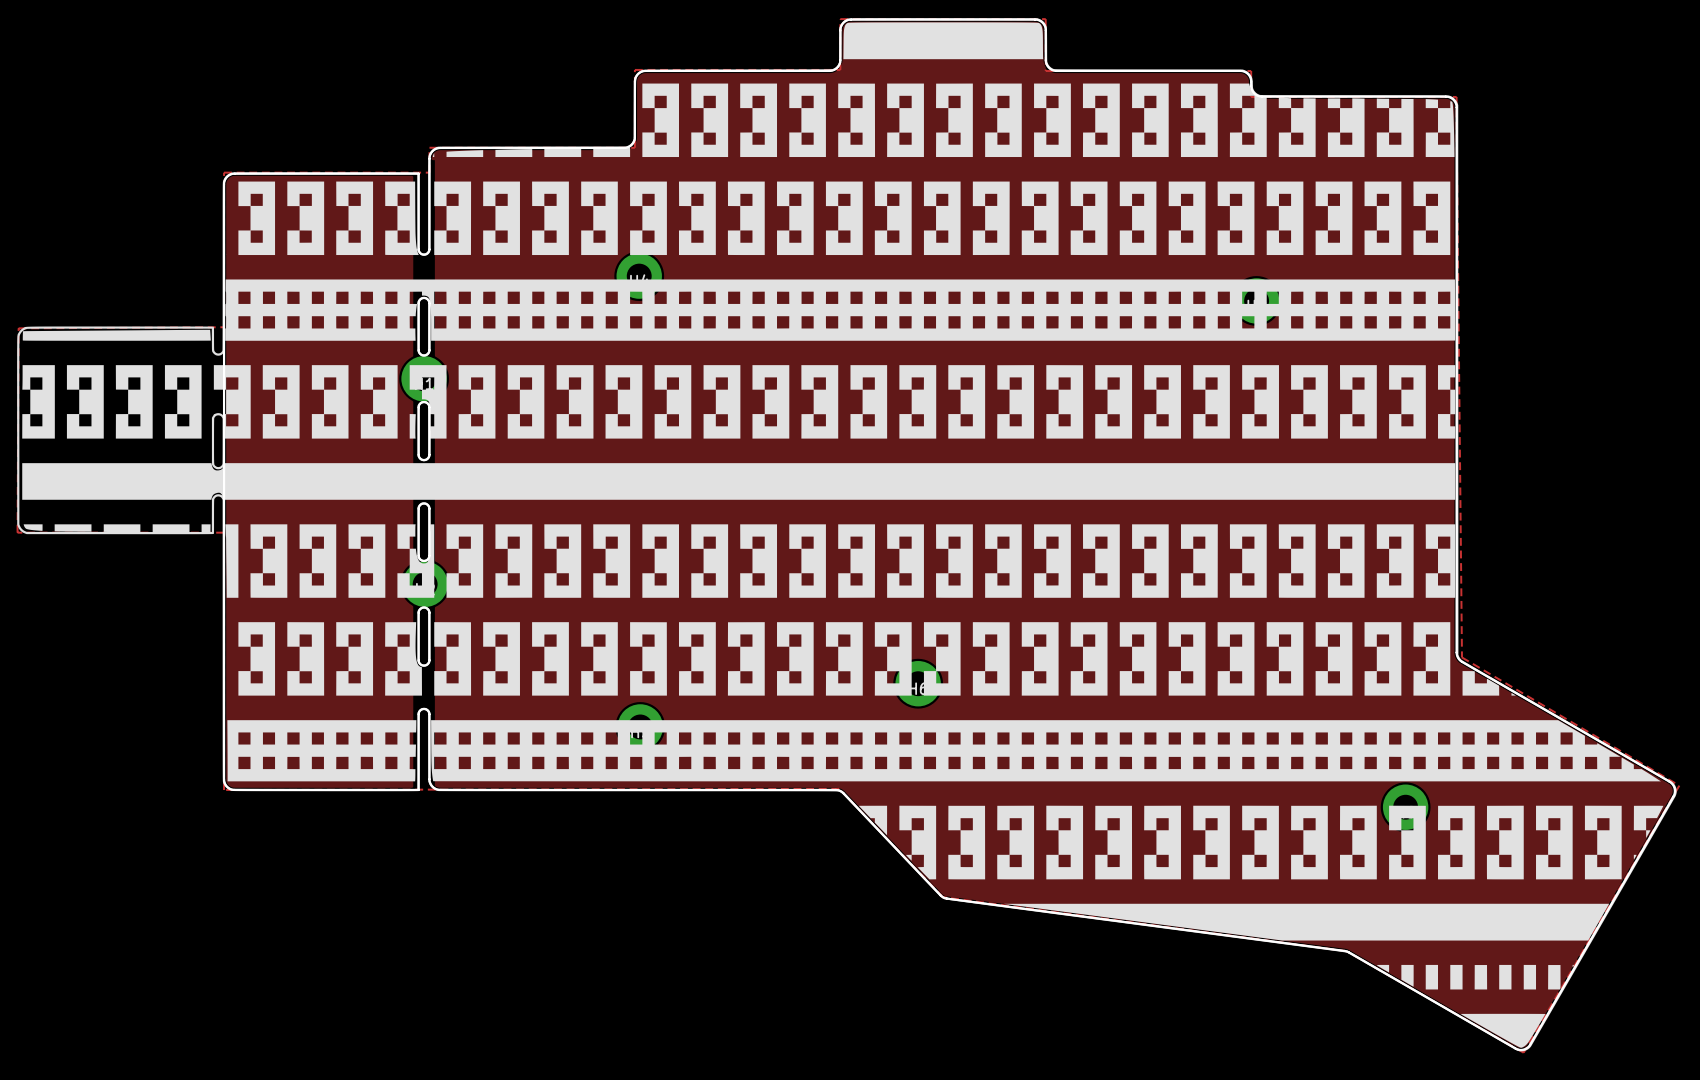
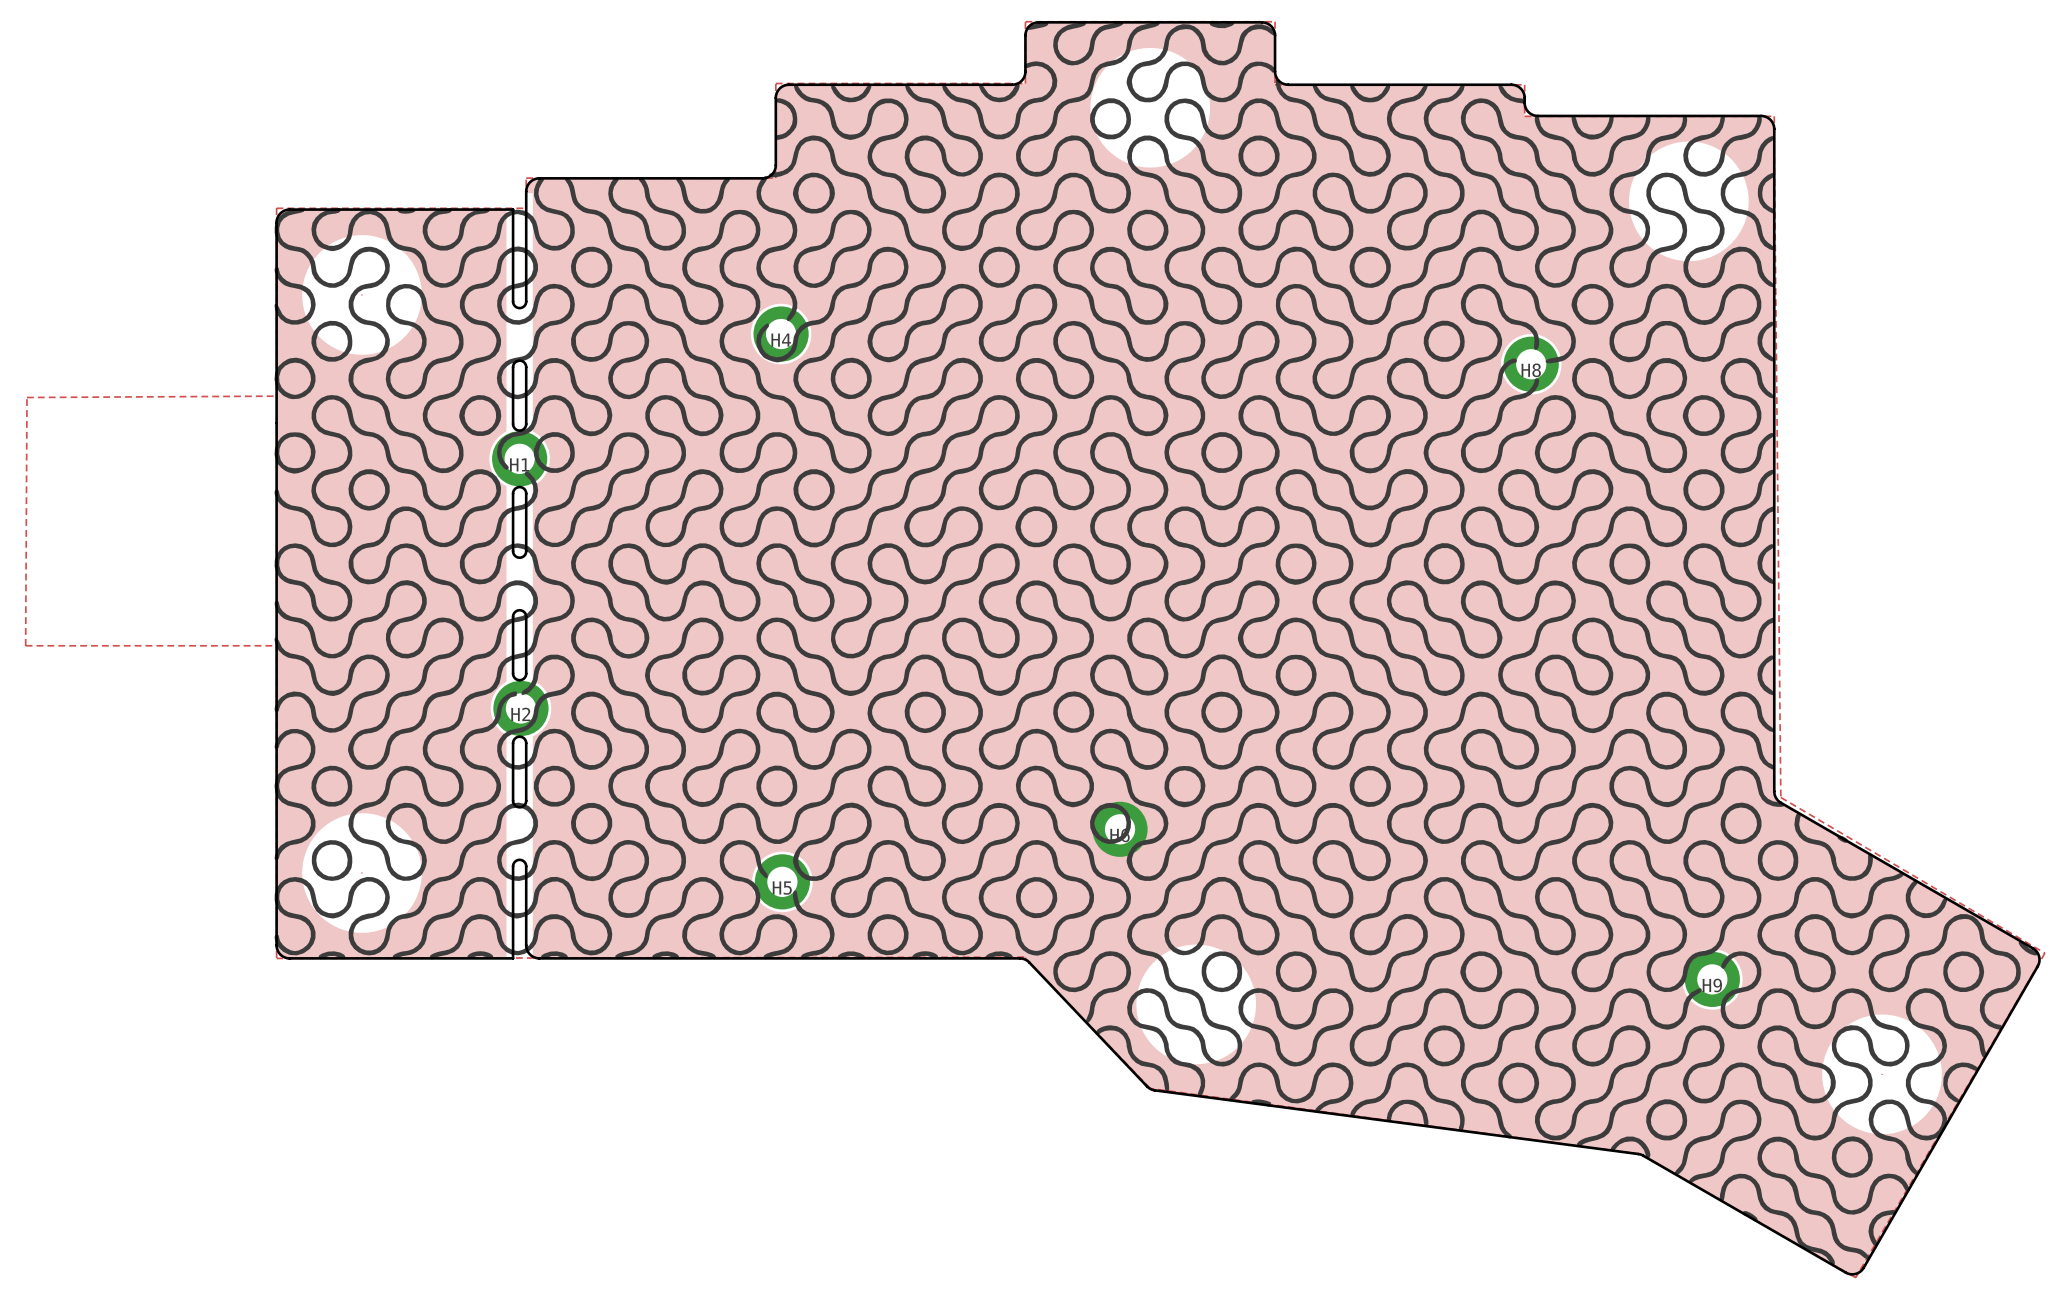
drawing: [17, 18, 1677, 1052] -> none
drawing: none -> [274, 20, 2038, 1266]
part: none -> (1882, 1074)

